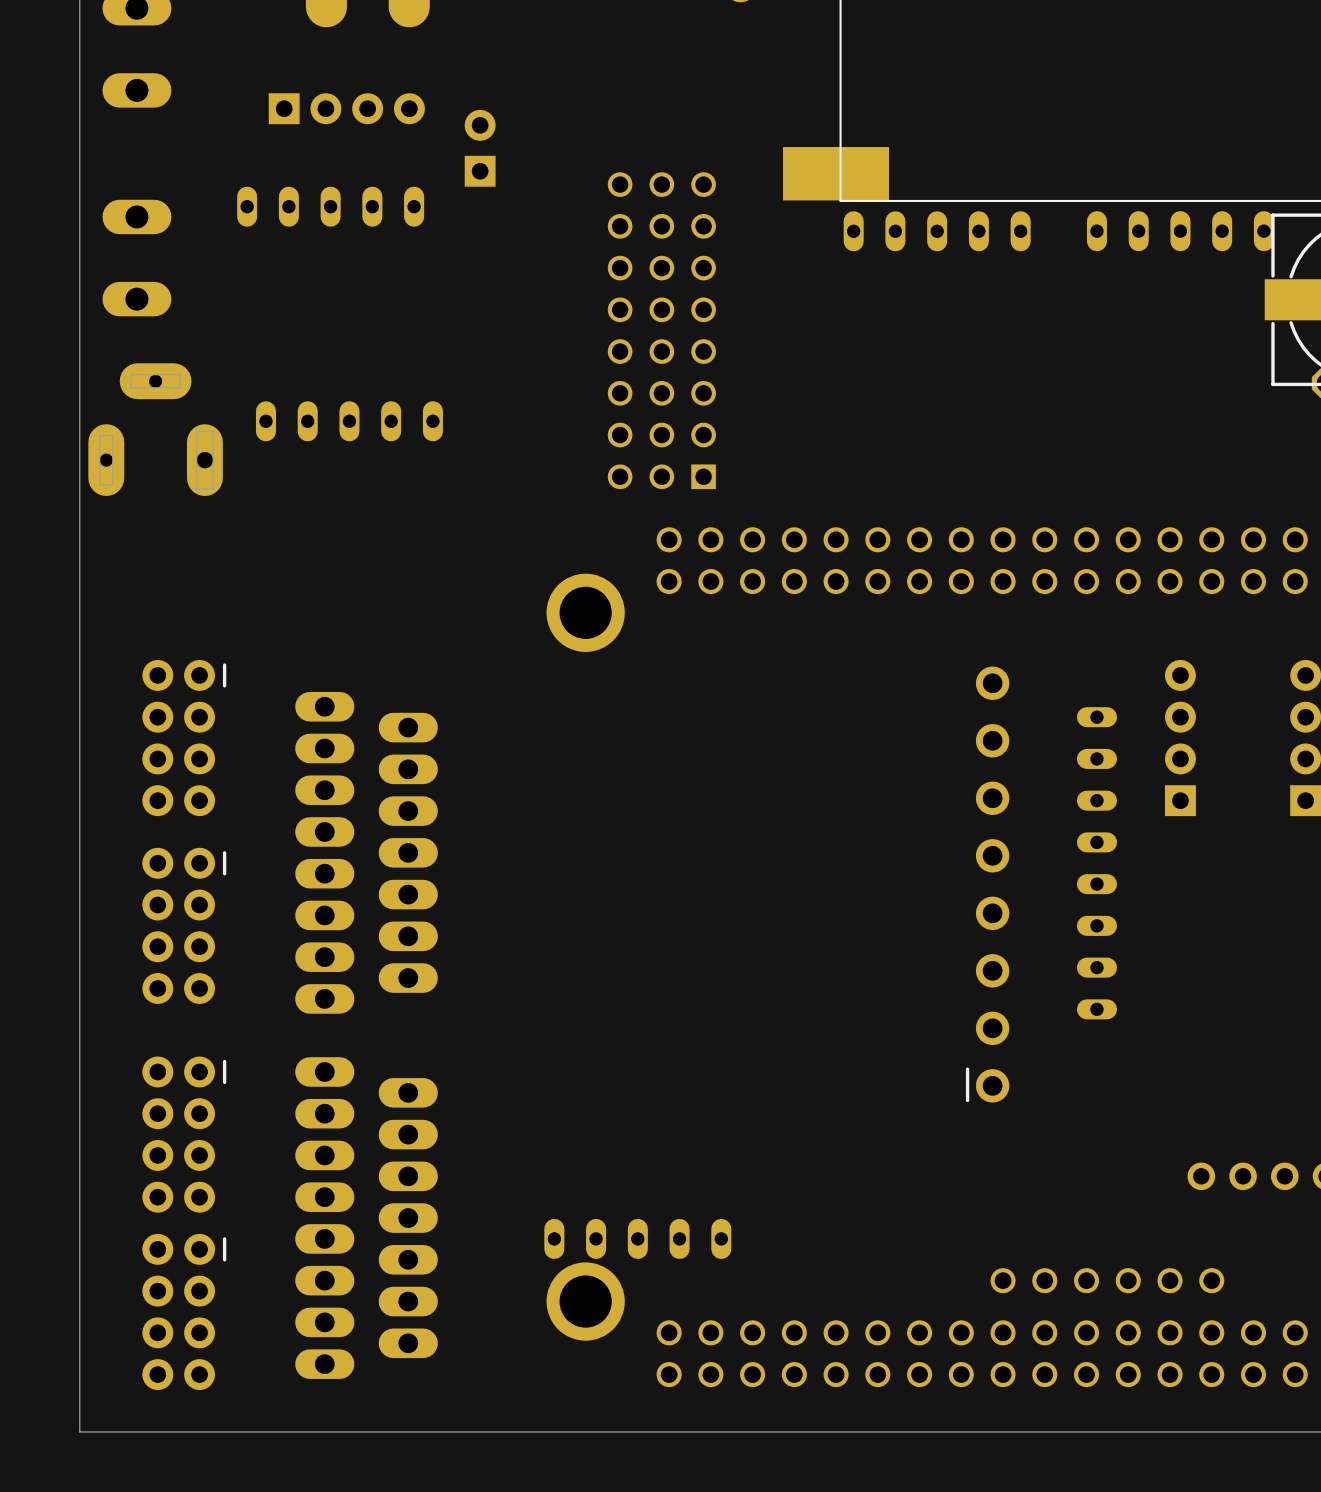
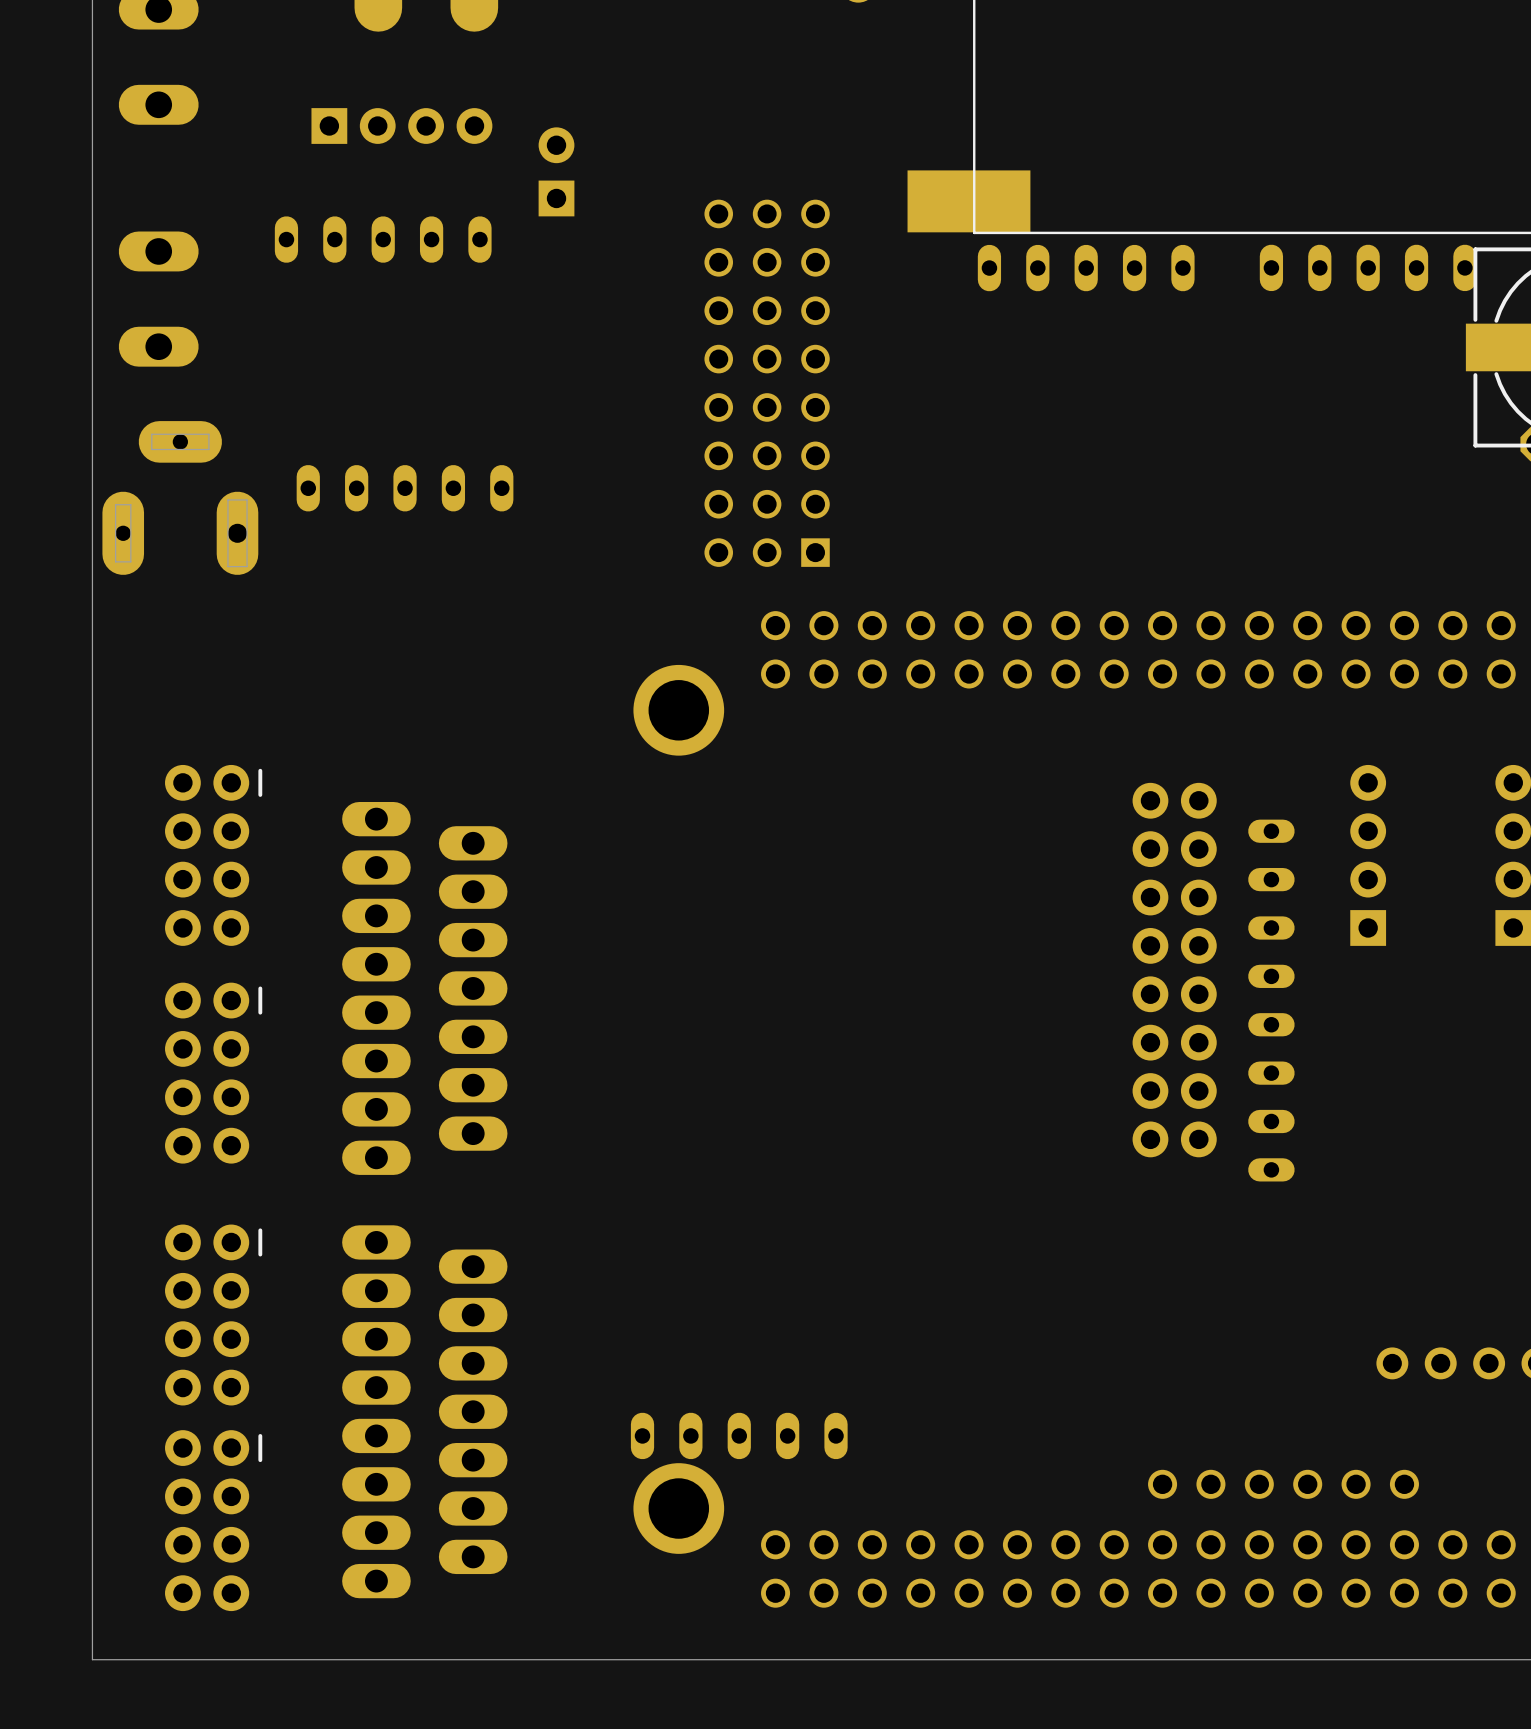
part: none -> (1150, 970)
part: none -> (1198, 970)
part: (987, 884) -> none

